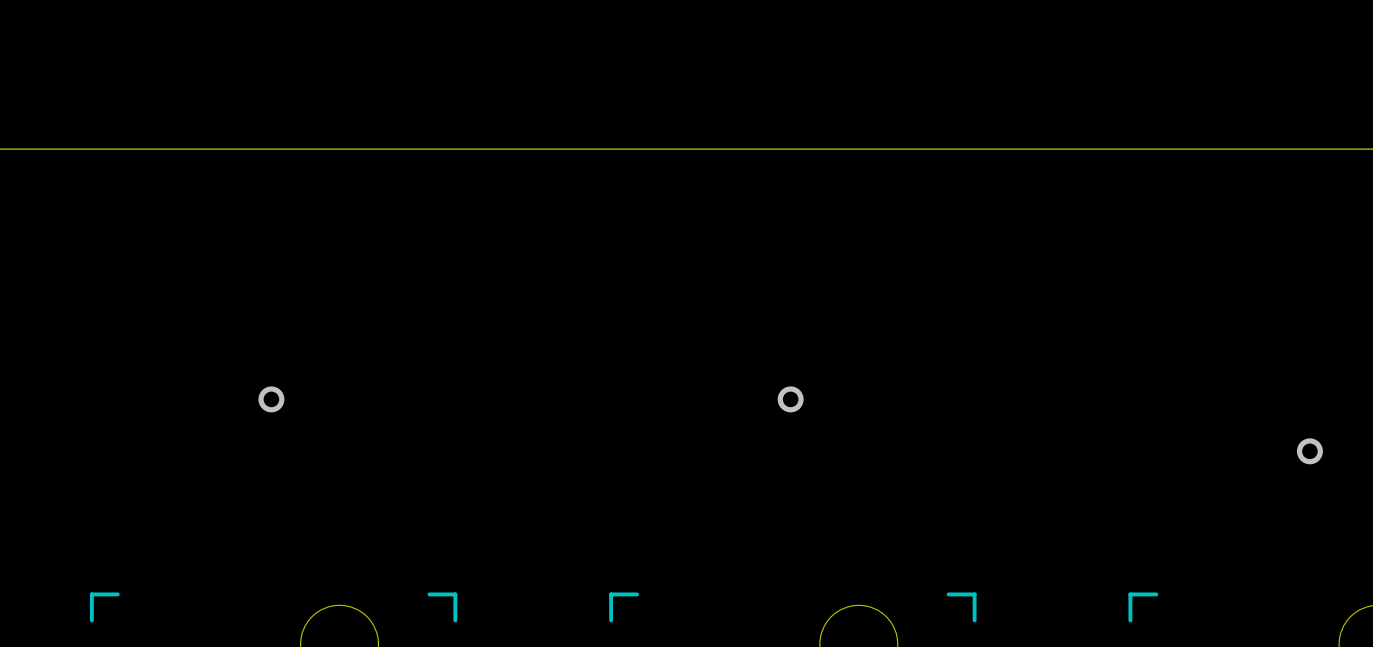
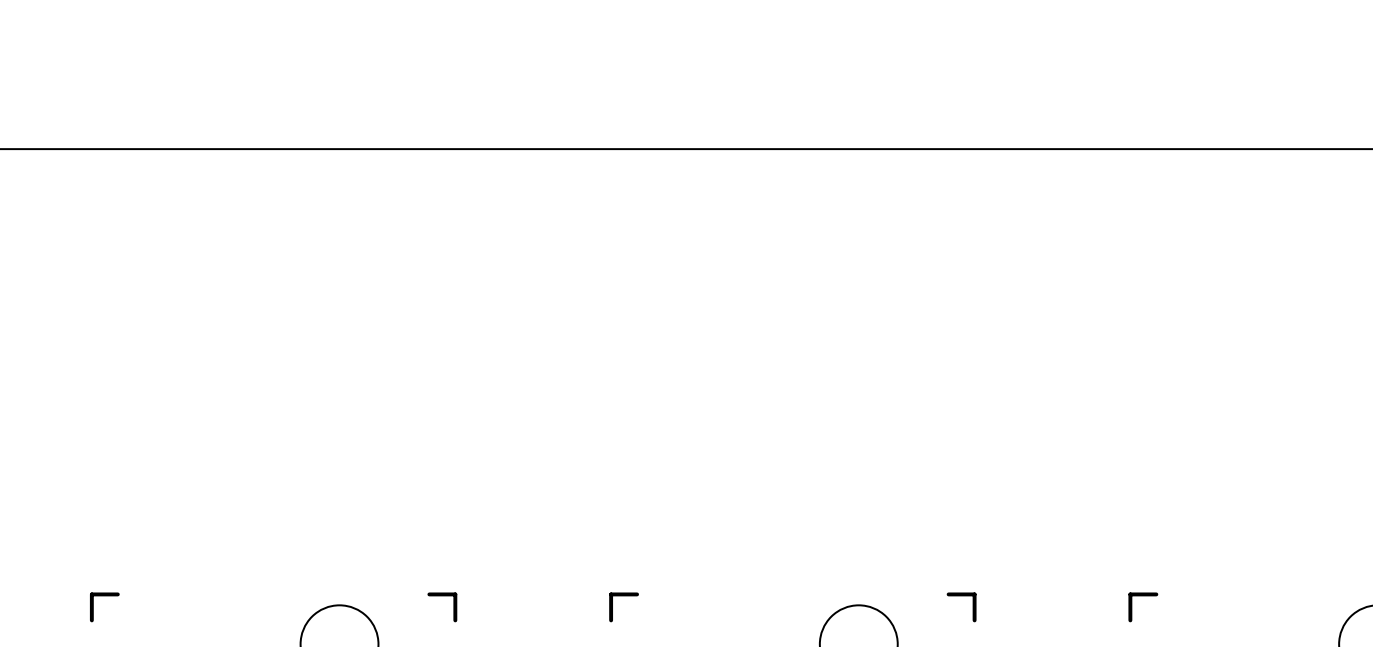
via: (271, 399) -> none
via: (790, 399) -> none
via: (1309, 451) -> none

